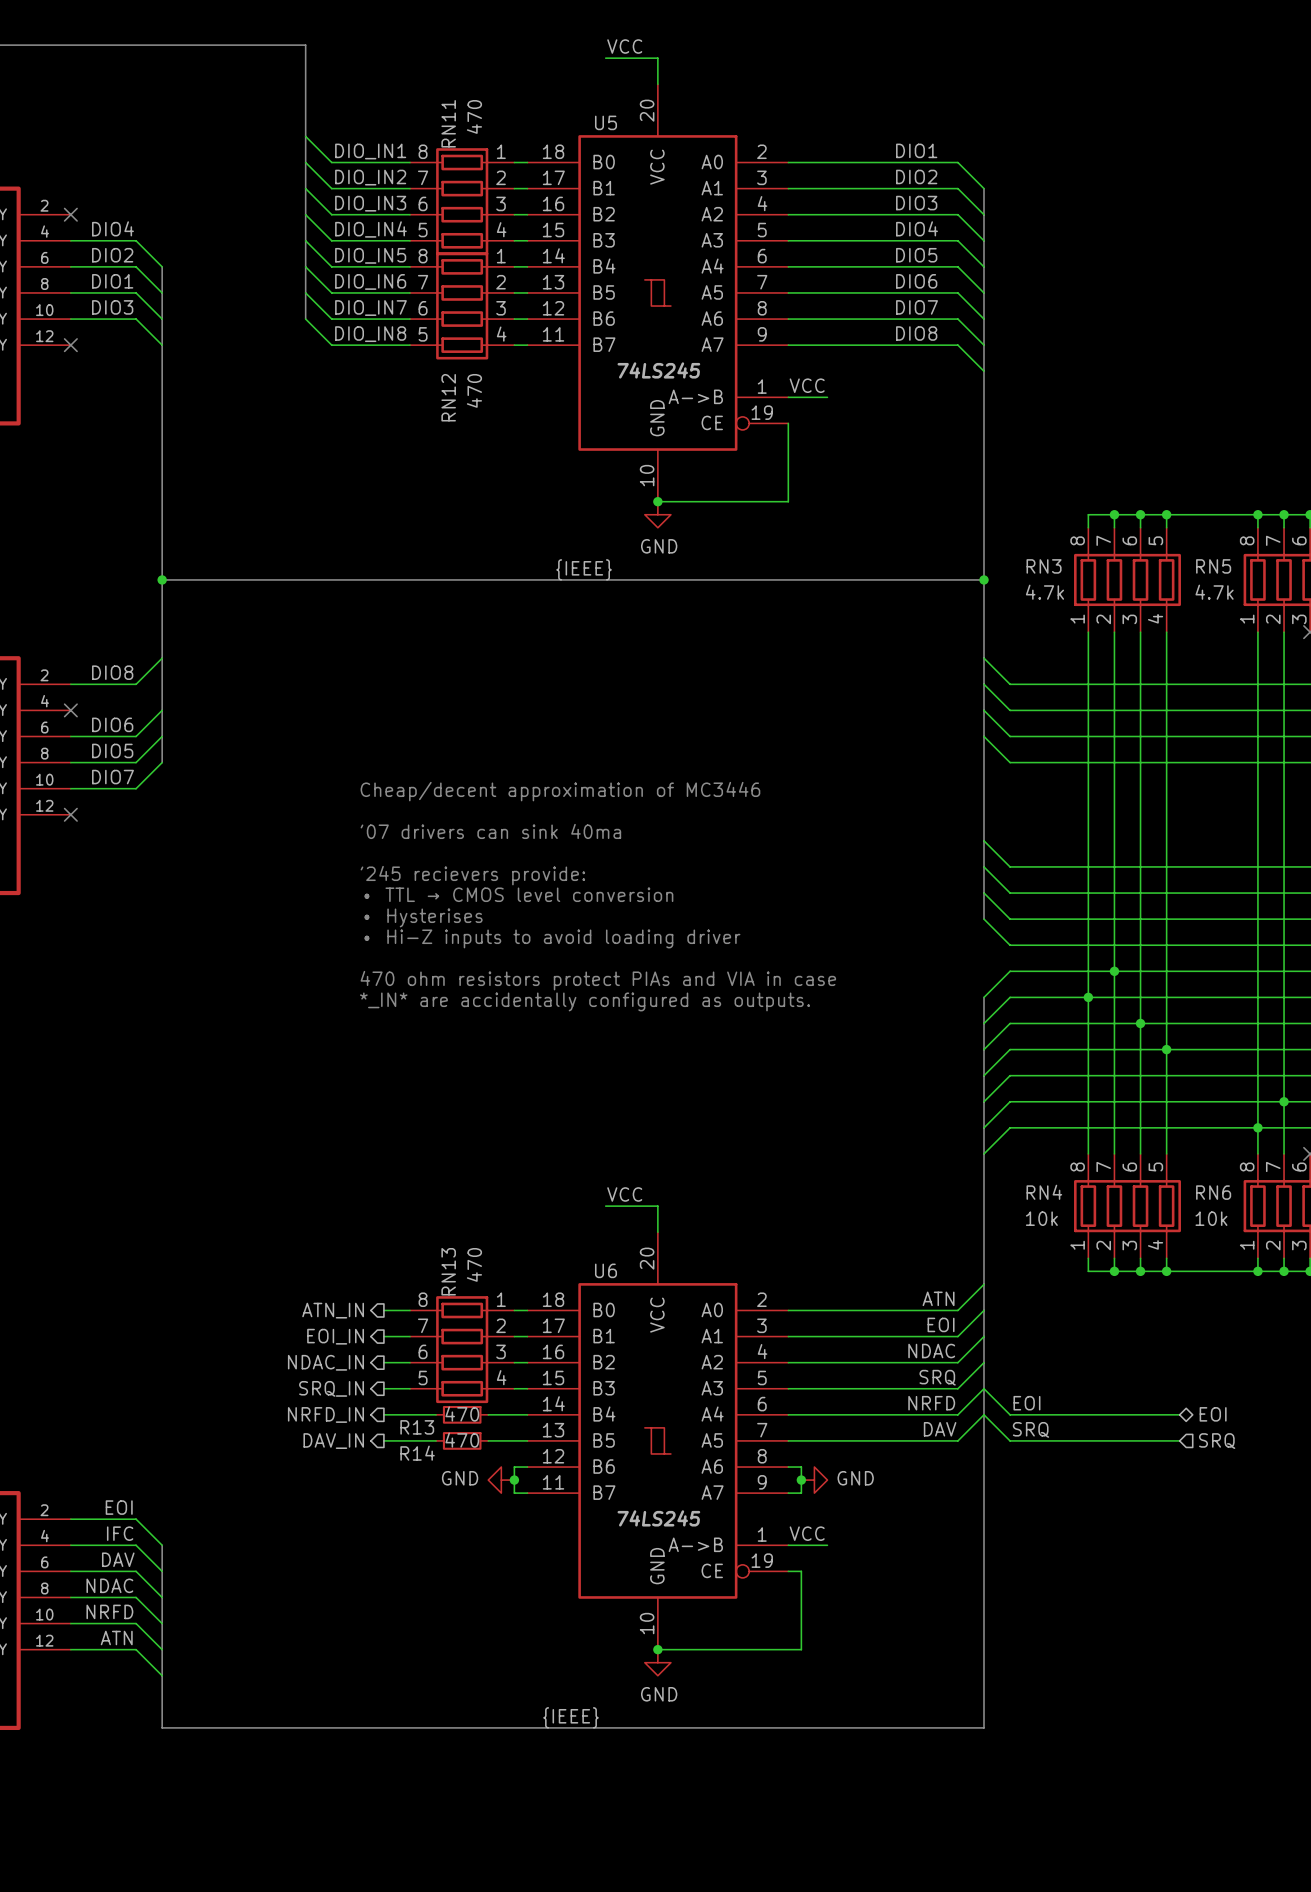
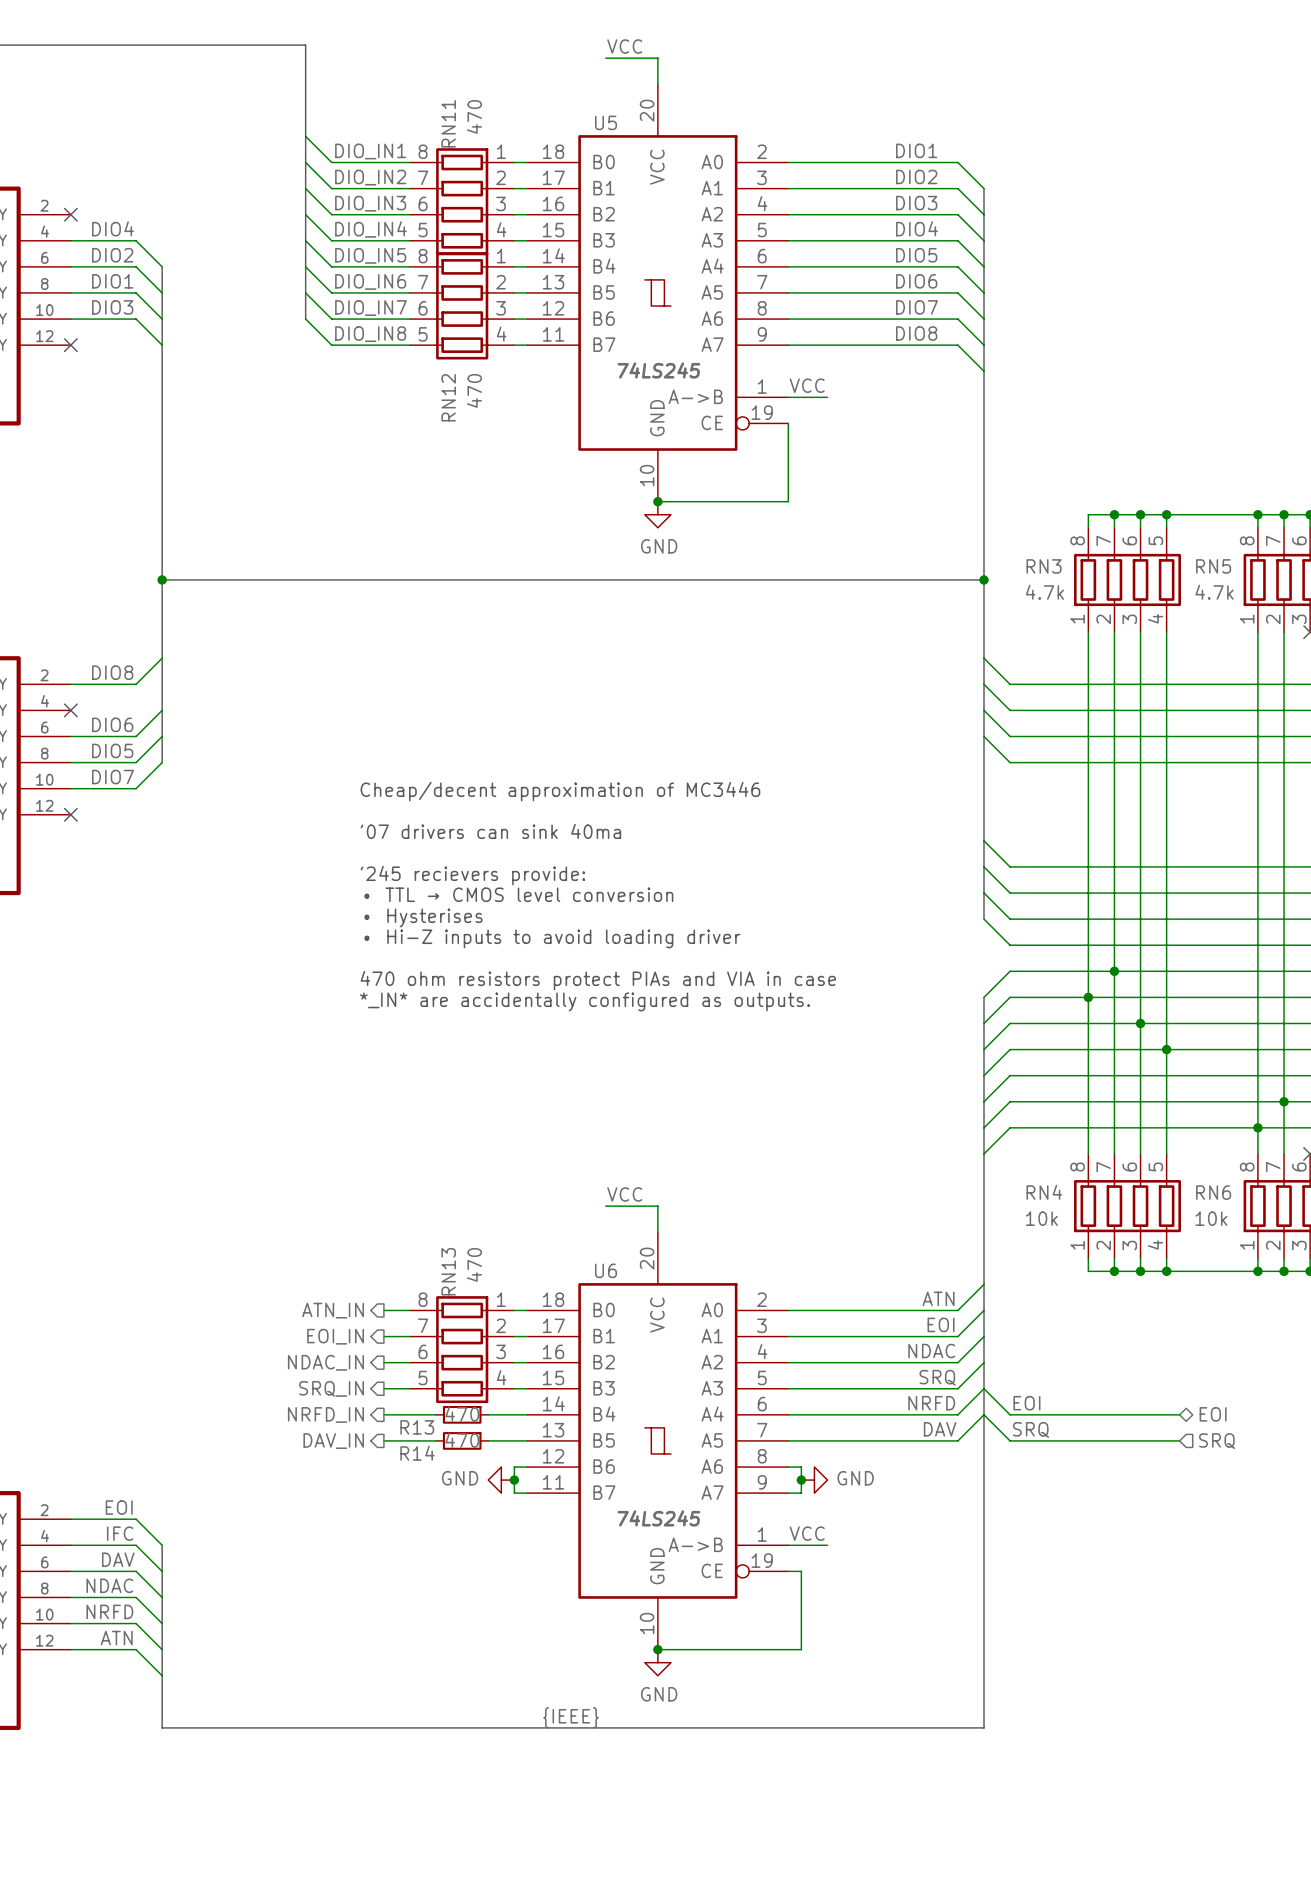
label: {IEEE} (584, 569) -> none

